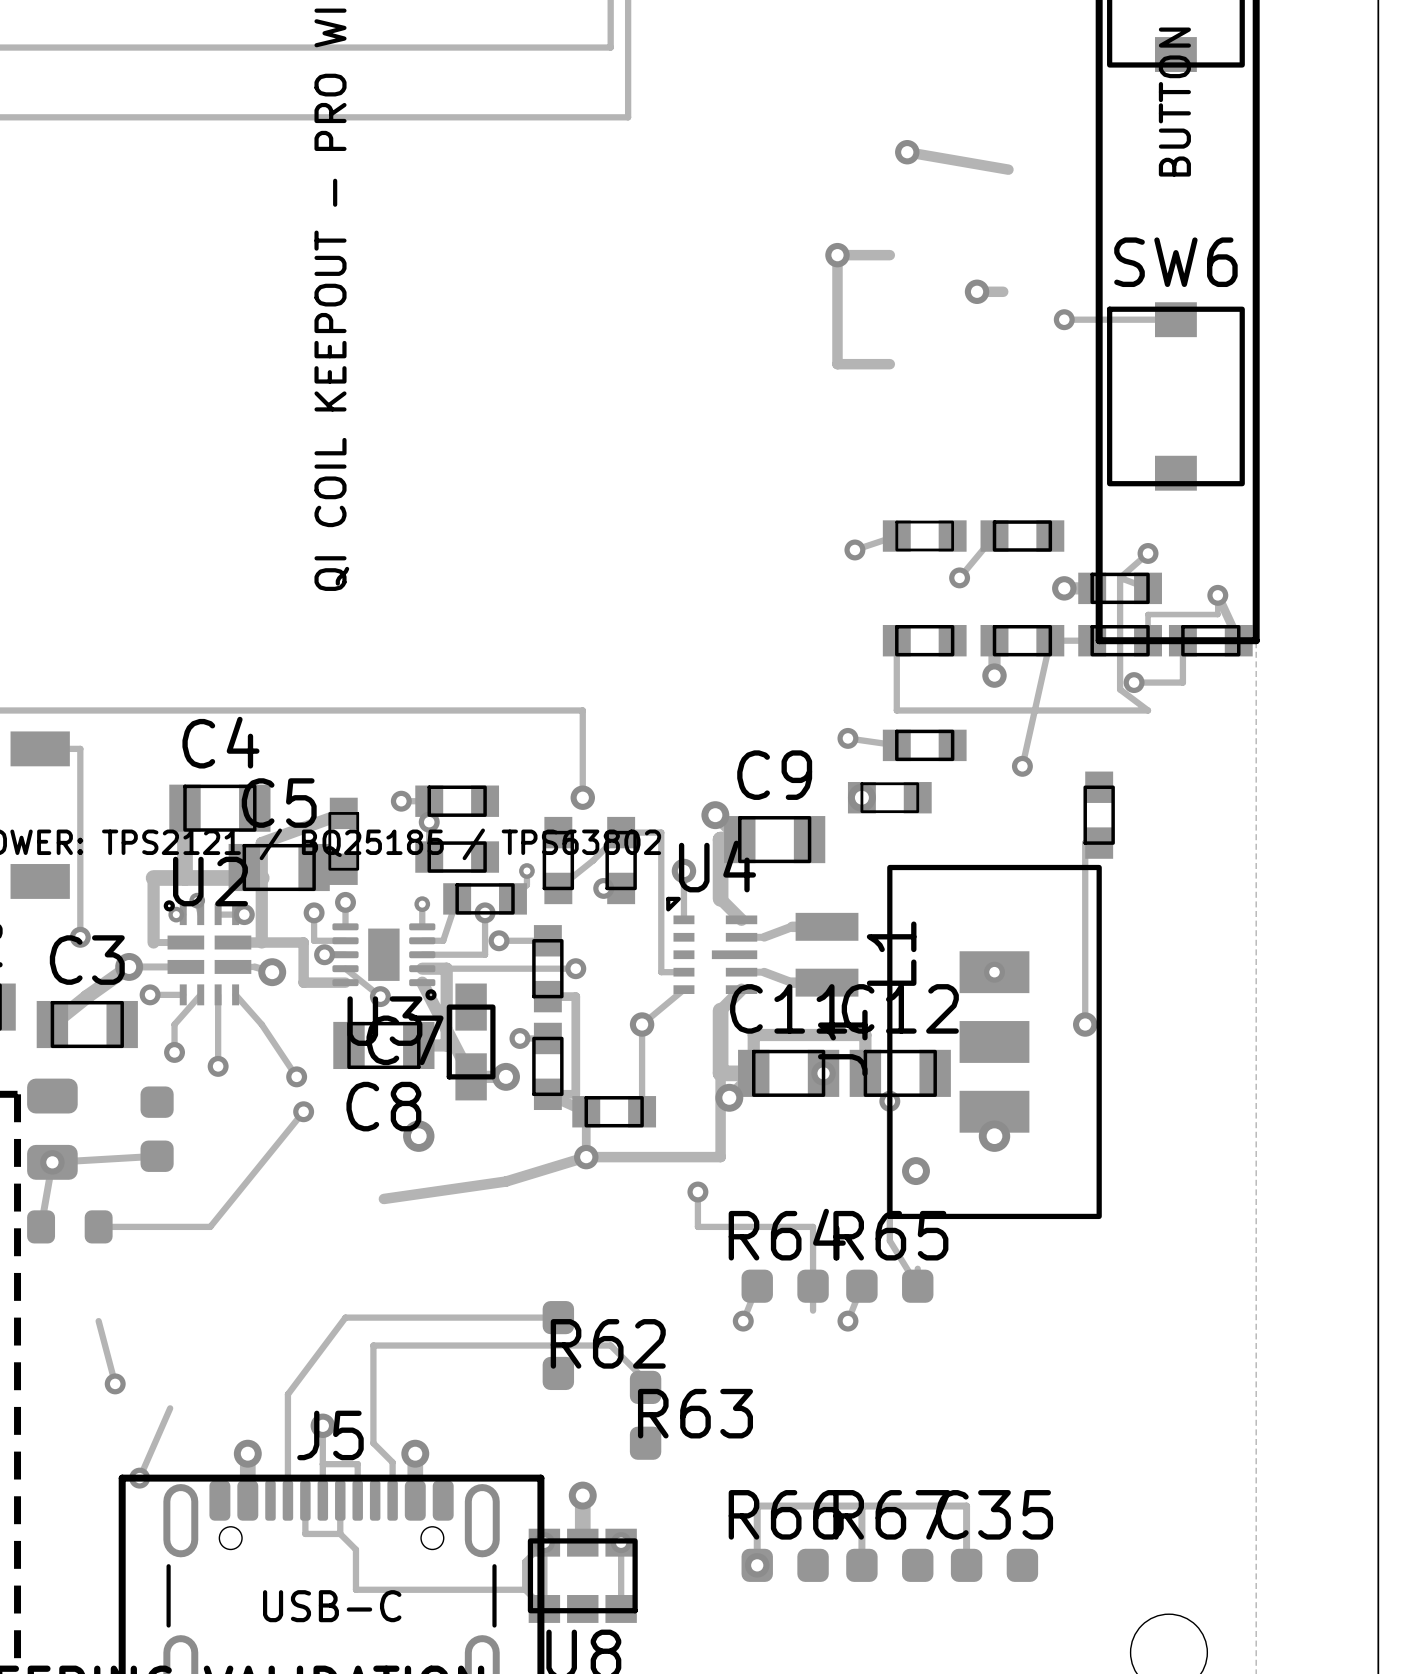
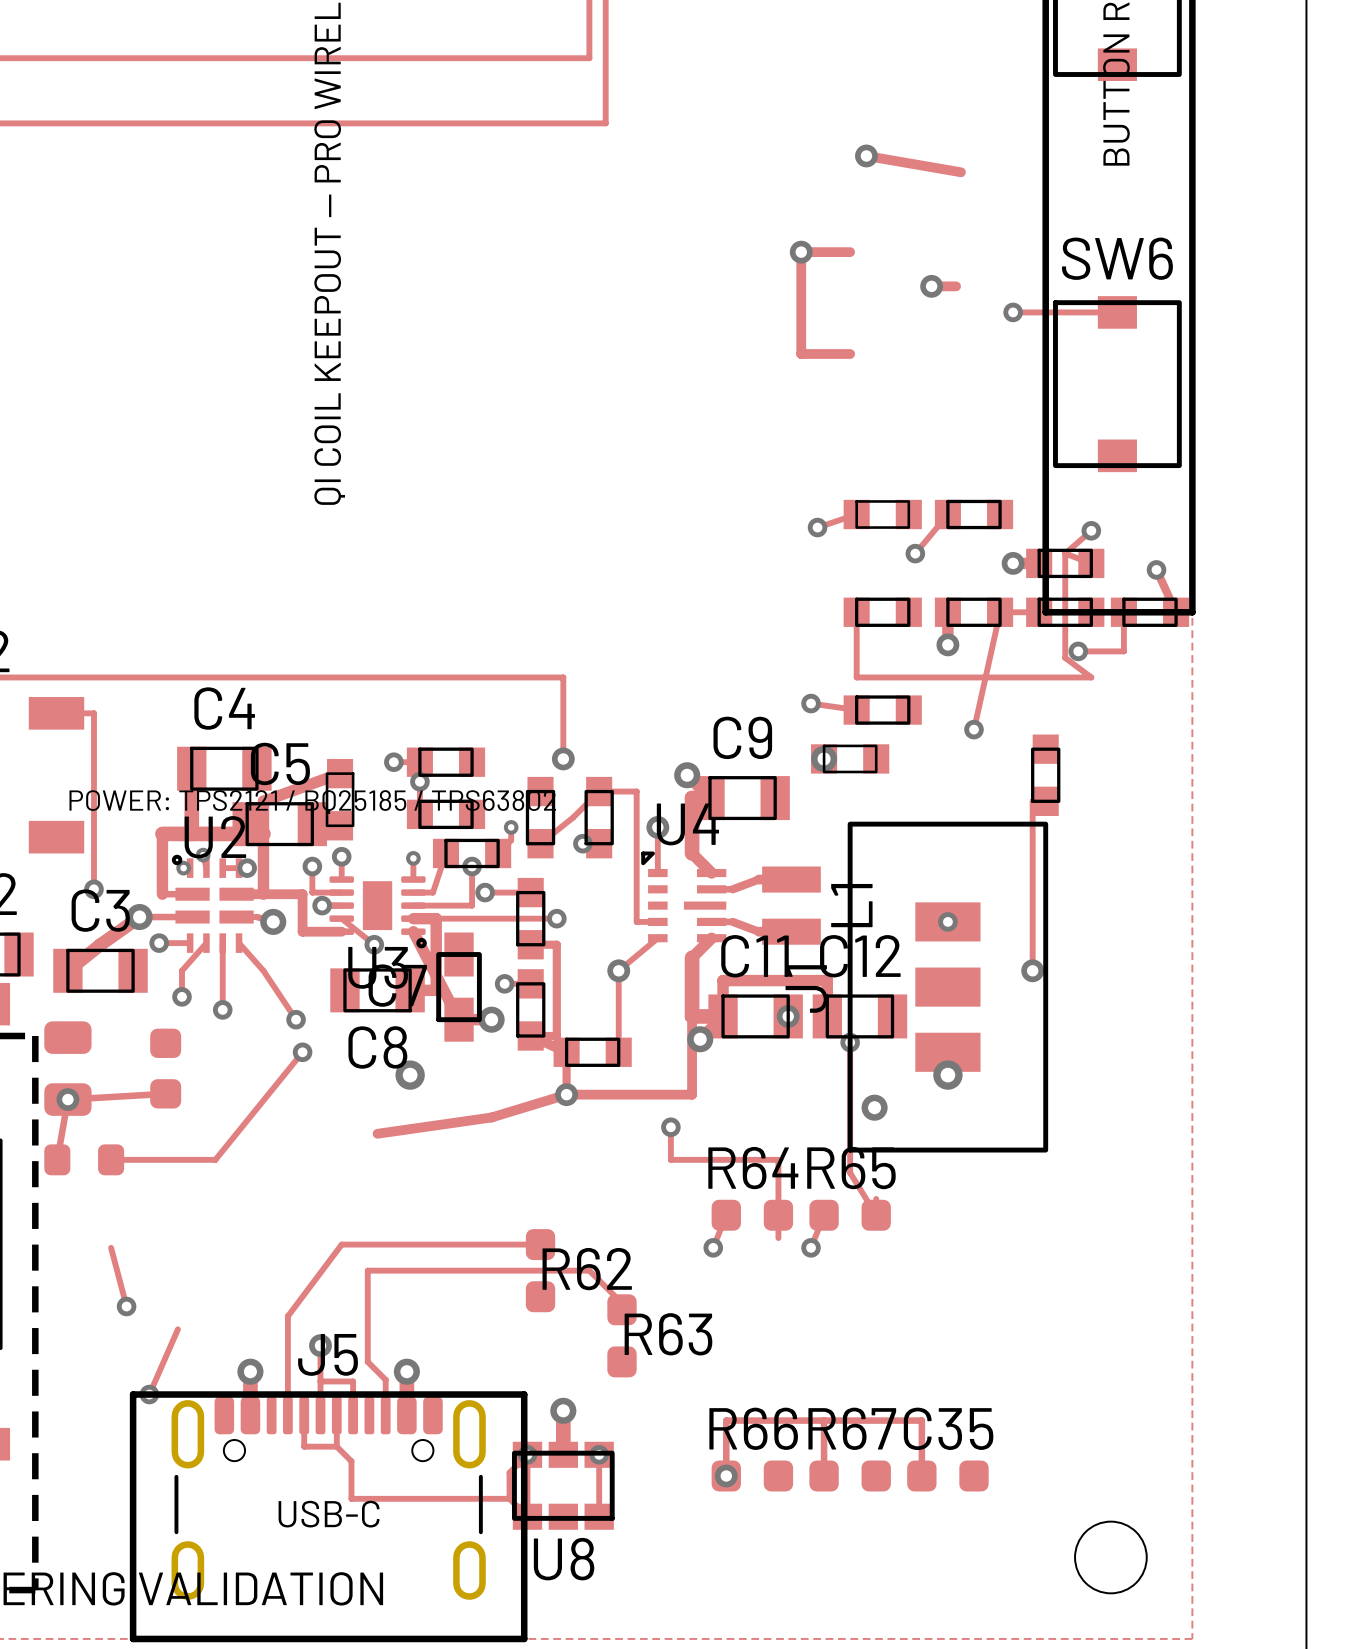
track: (1217, 595) (1217, 614) (1148, 614) (1148, 640) -> none

